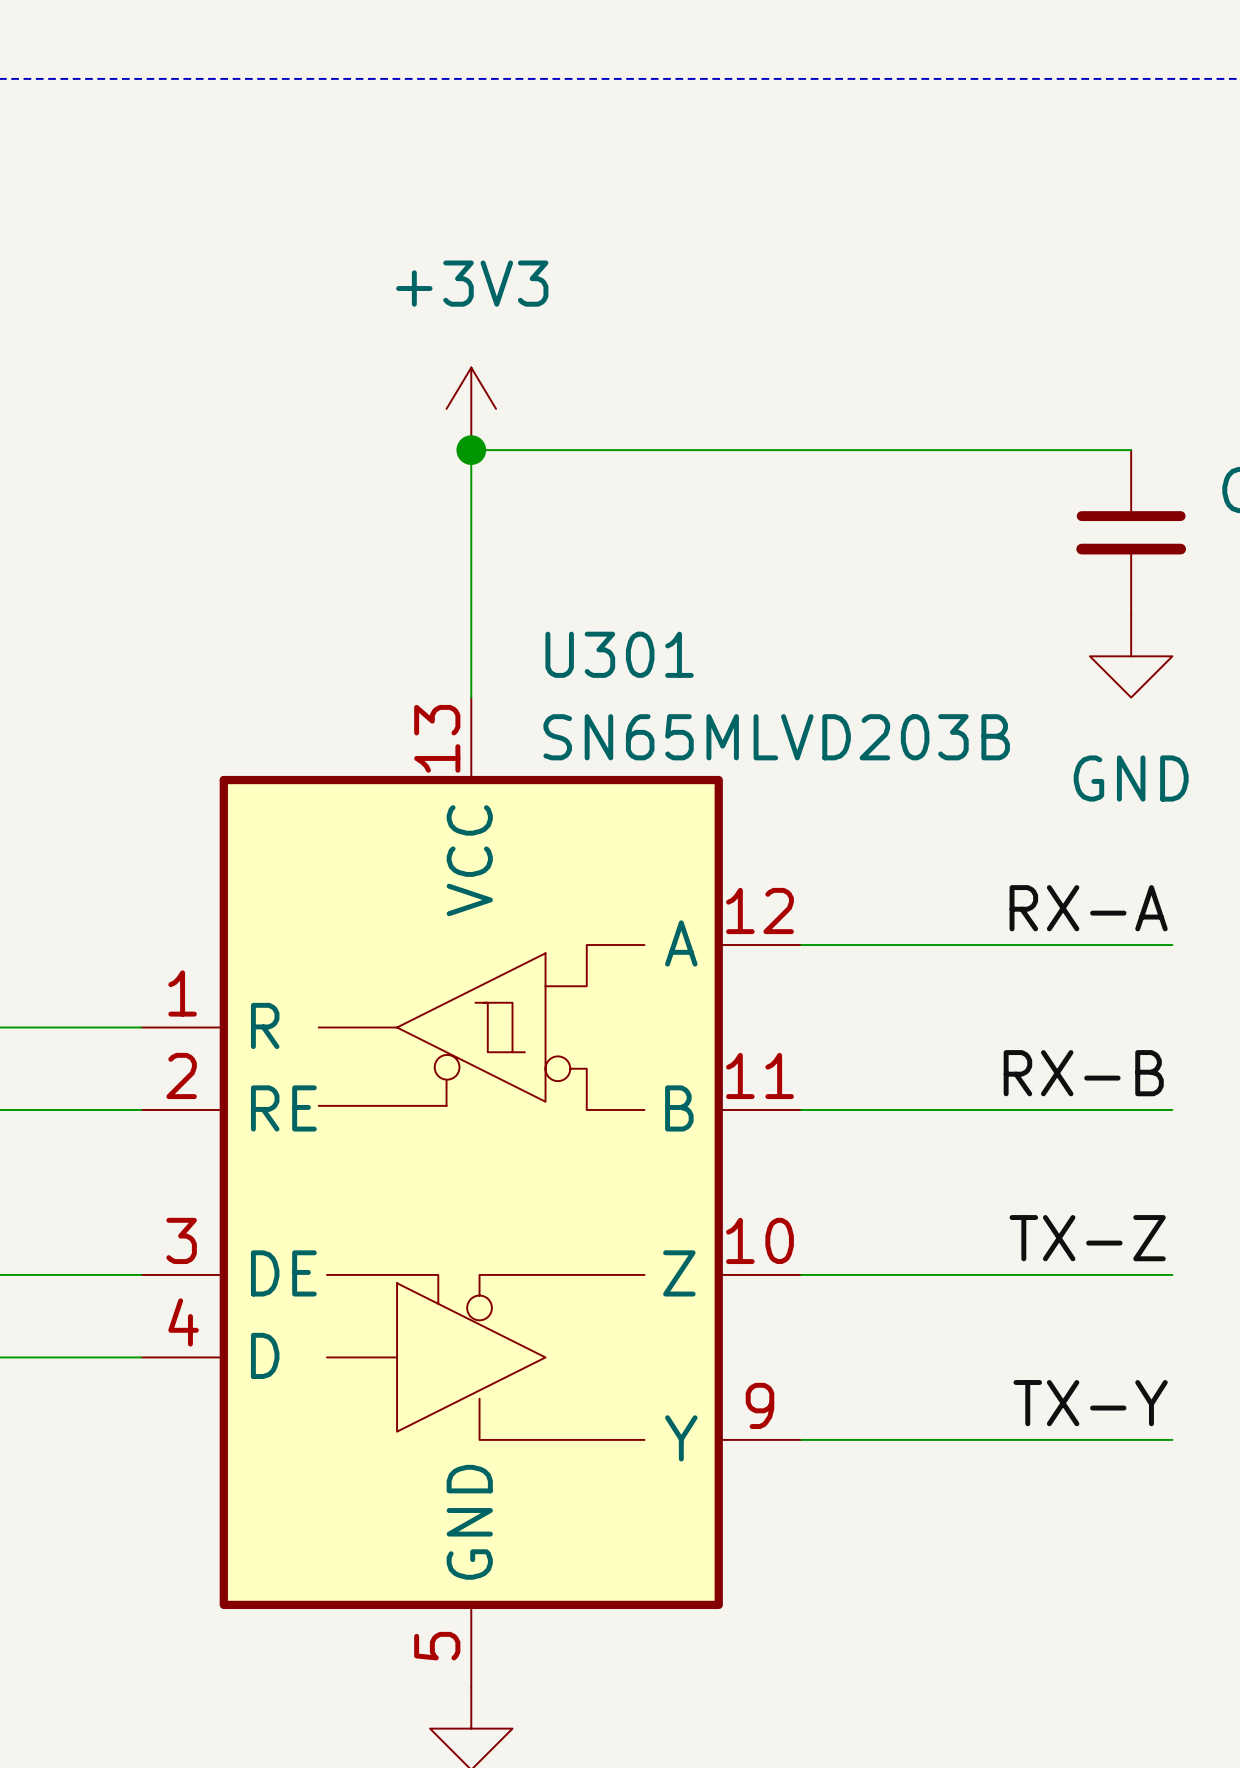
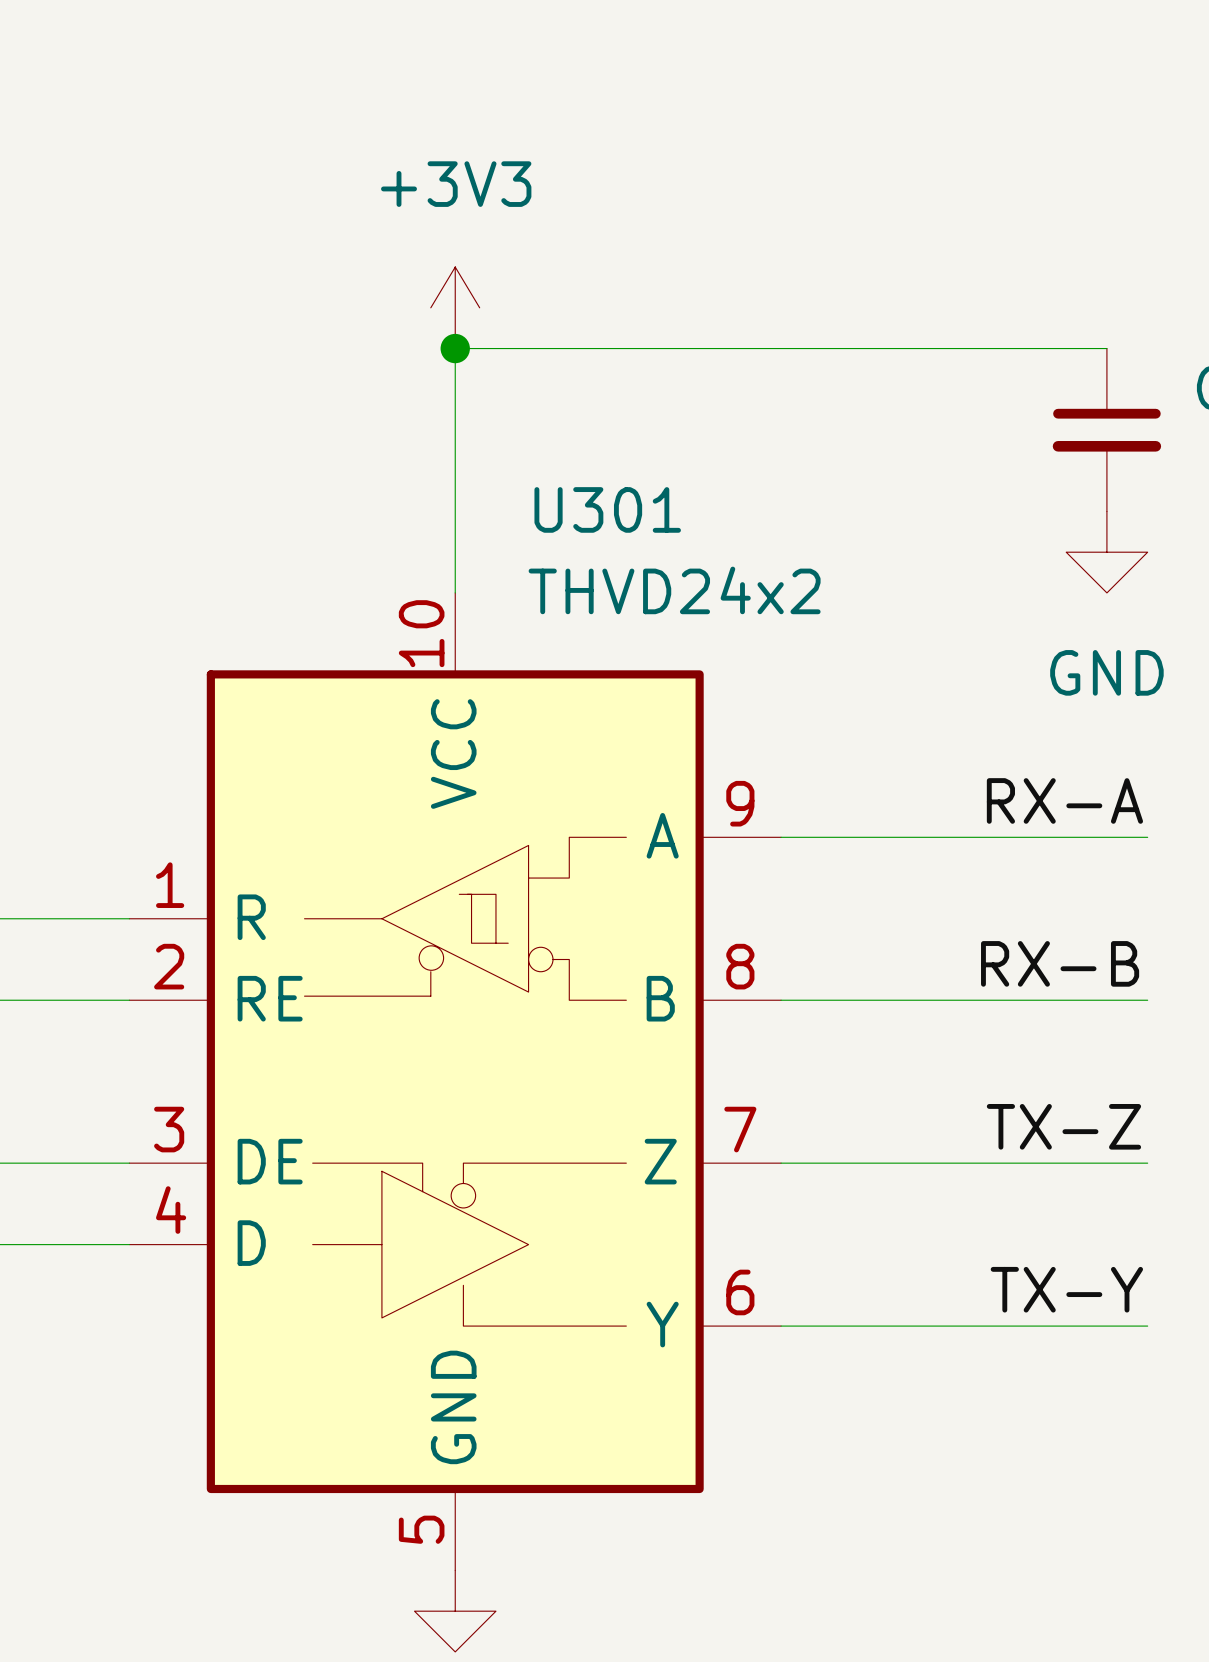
U301 name position: U301 (619, 654) -> U301 (607, 509)
U301 value: SN65MLVD203B (776, 737) -> THVD24x2 (674, 590)
U301 pin number: 13 (437, 738) -> 10 (421, 633)
U301 pin number: 12 (759, 911) -> 9 (740, 803)
U301 pin number: 11 (759, 1075) -> 8 (740, 966)
U301 pin number: 10 (759, 1240) -> 7 (740, 1129)
U301 pin number: 9 (759, 1405) -> 6 (740, 1292)

